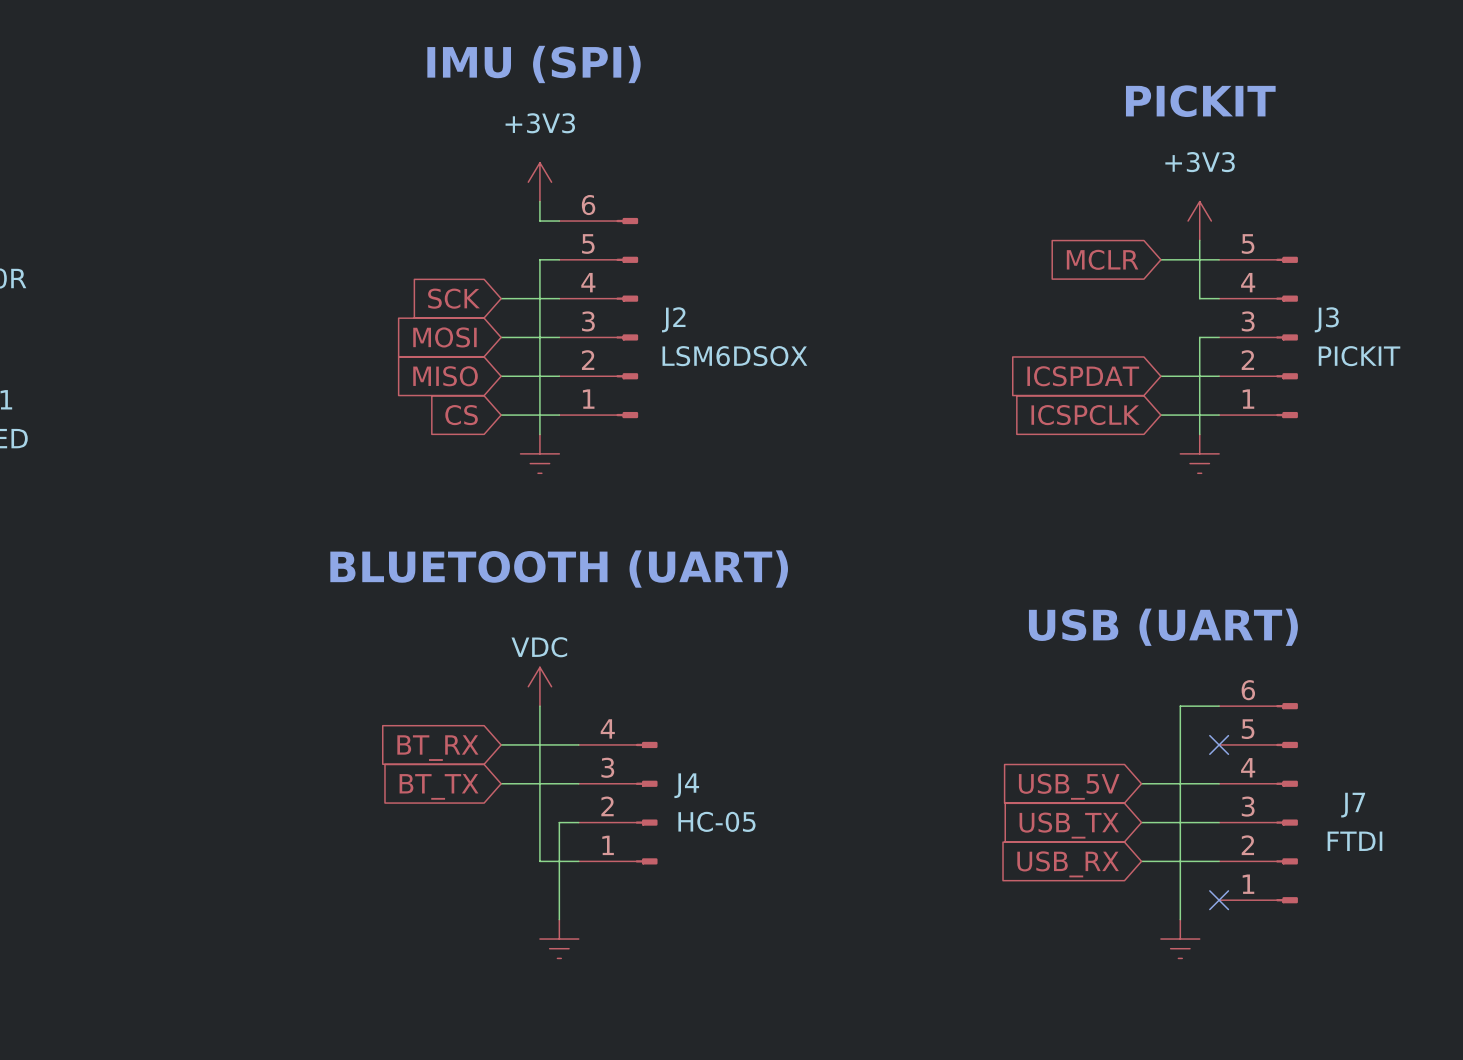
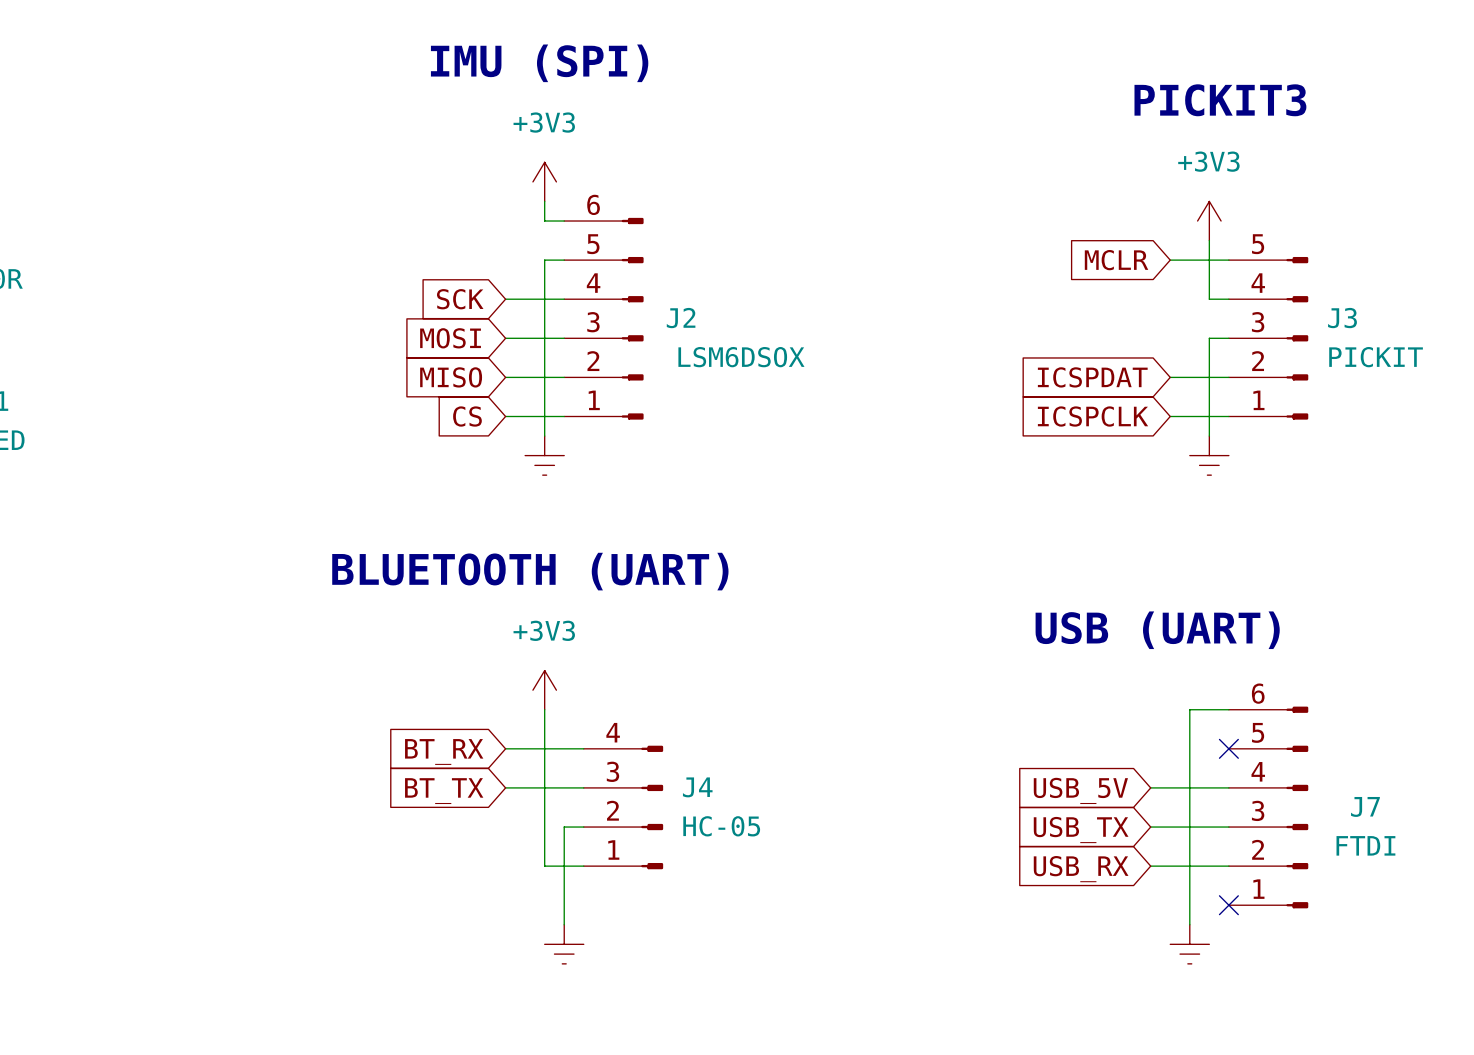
text: PICKIT (1200, 101) -> PICKIT3 (1220, 100)
power symbol: VDC (539, 686) -> +3V3 (544, 690)

